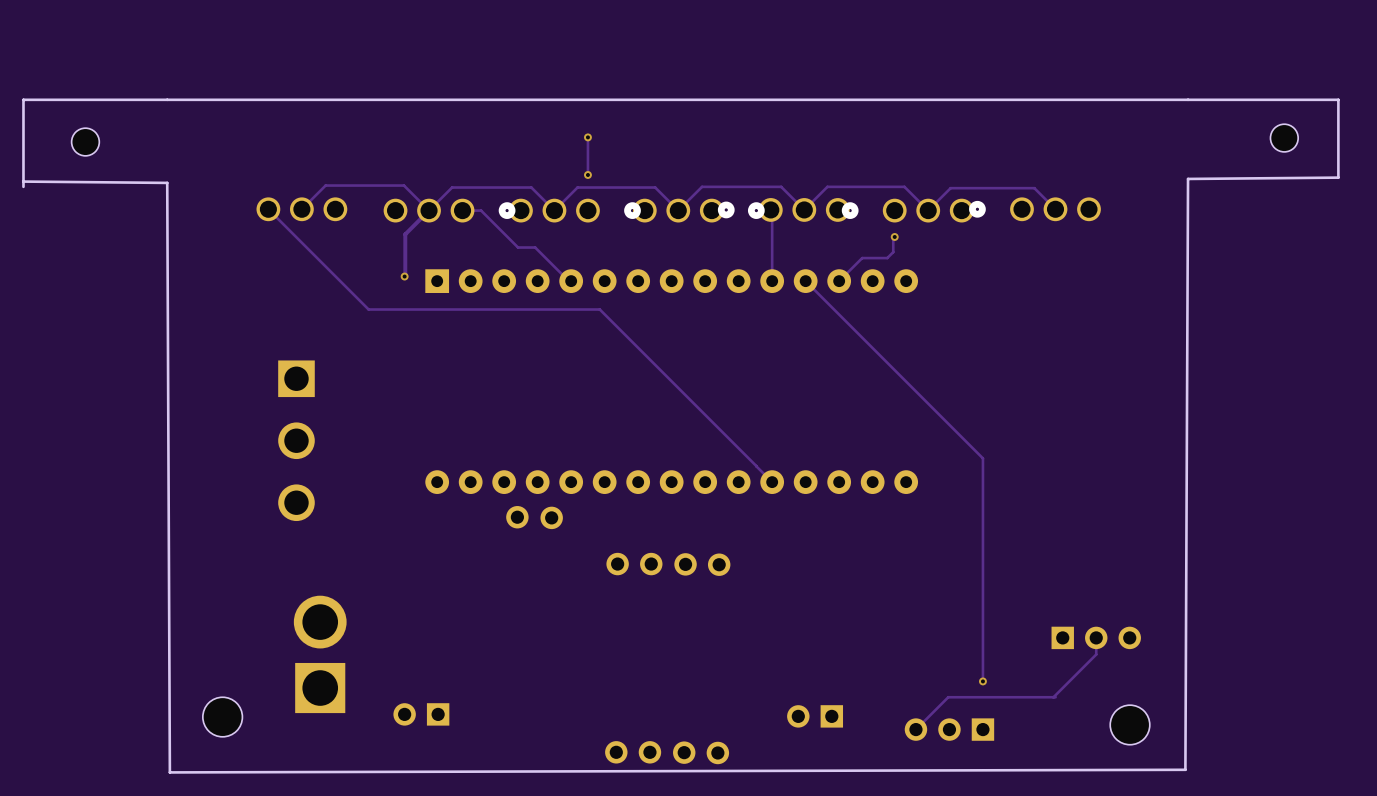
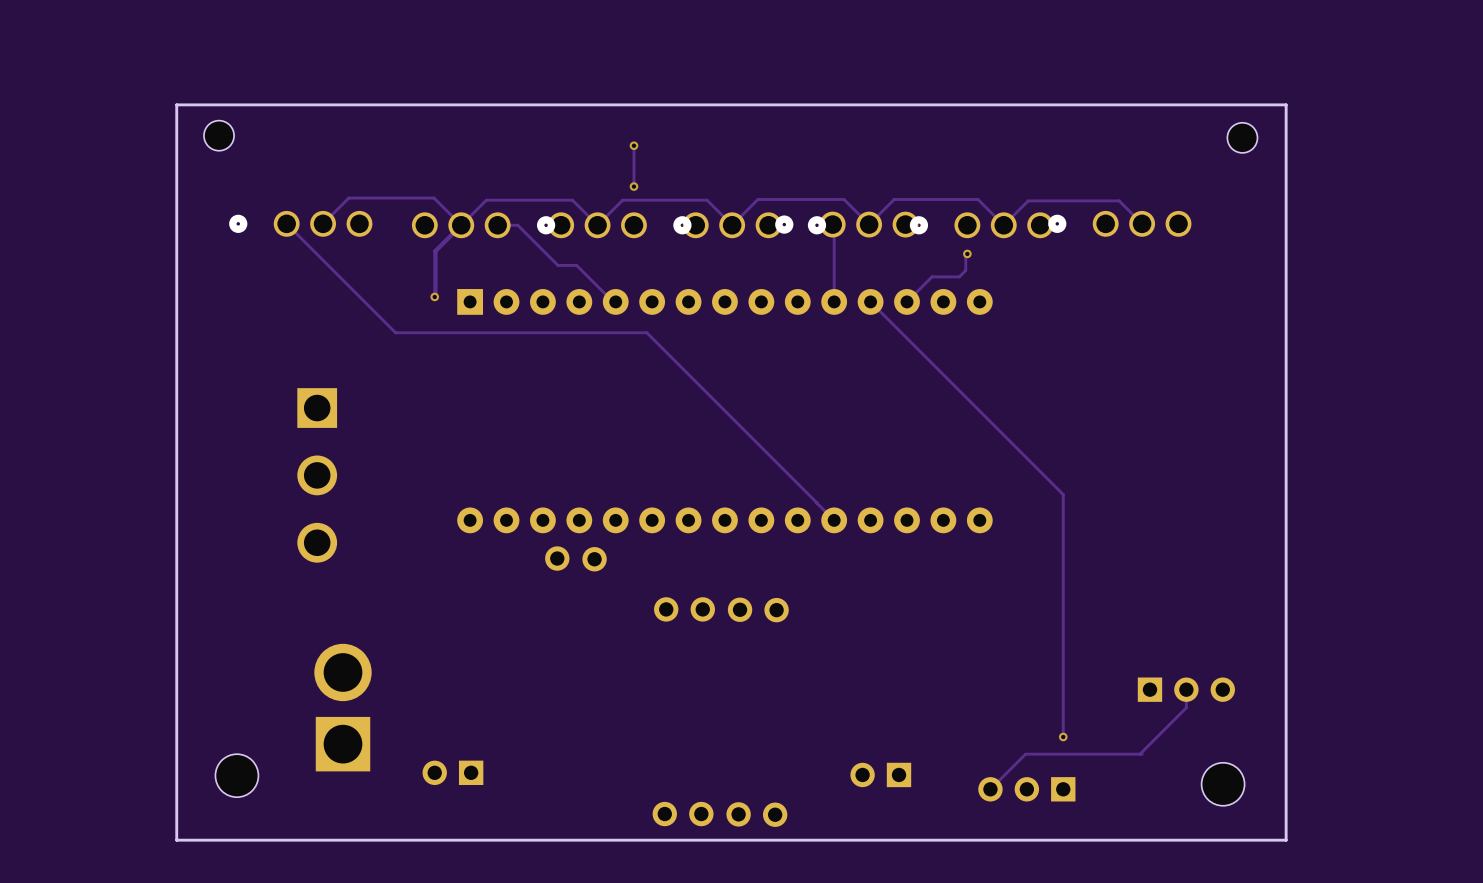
board edge: (167, 99) (23, 99) (23, 186) -> none
board edge: (1188, 99) (1338, 99) (1338, 177) (1188, 178) (1185, 769) (169, 772) (167, 182) (23, 181) -> (1286, 104) (1286, 840) (176, 840) (176, 104)
part position: (1284, 138) -> (1242, 137)
part position: (85, 142) -> (219, 135)
part: none -> (300, 223)

